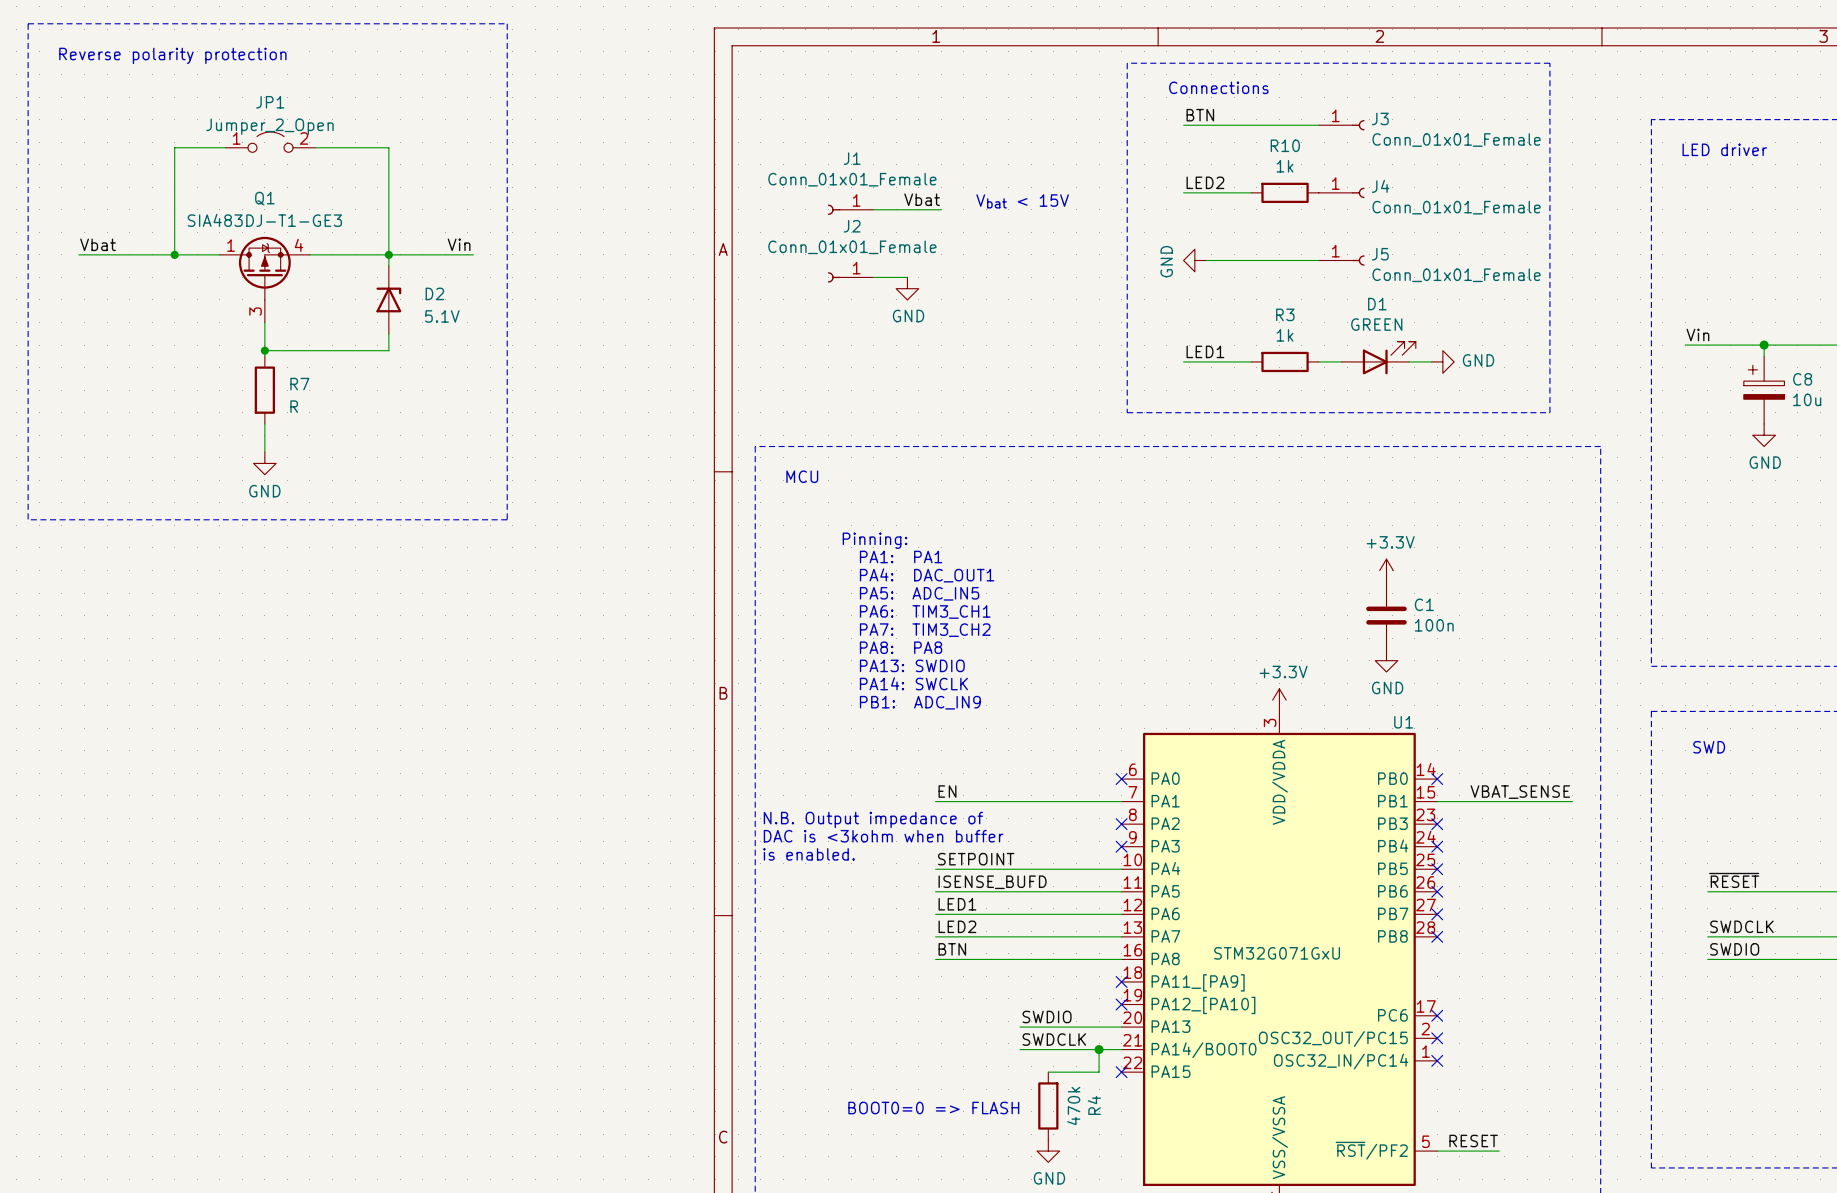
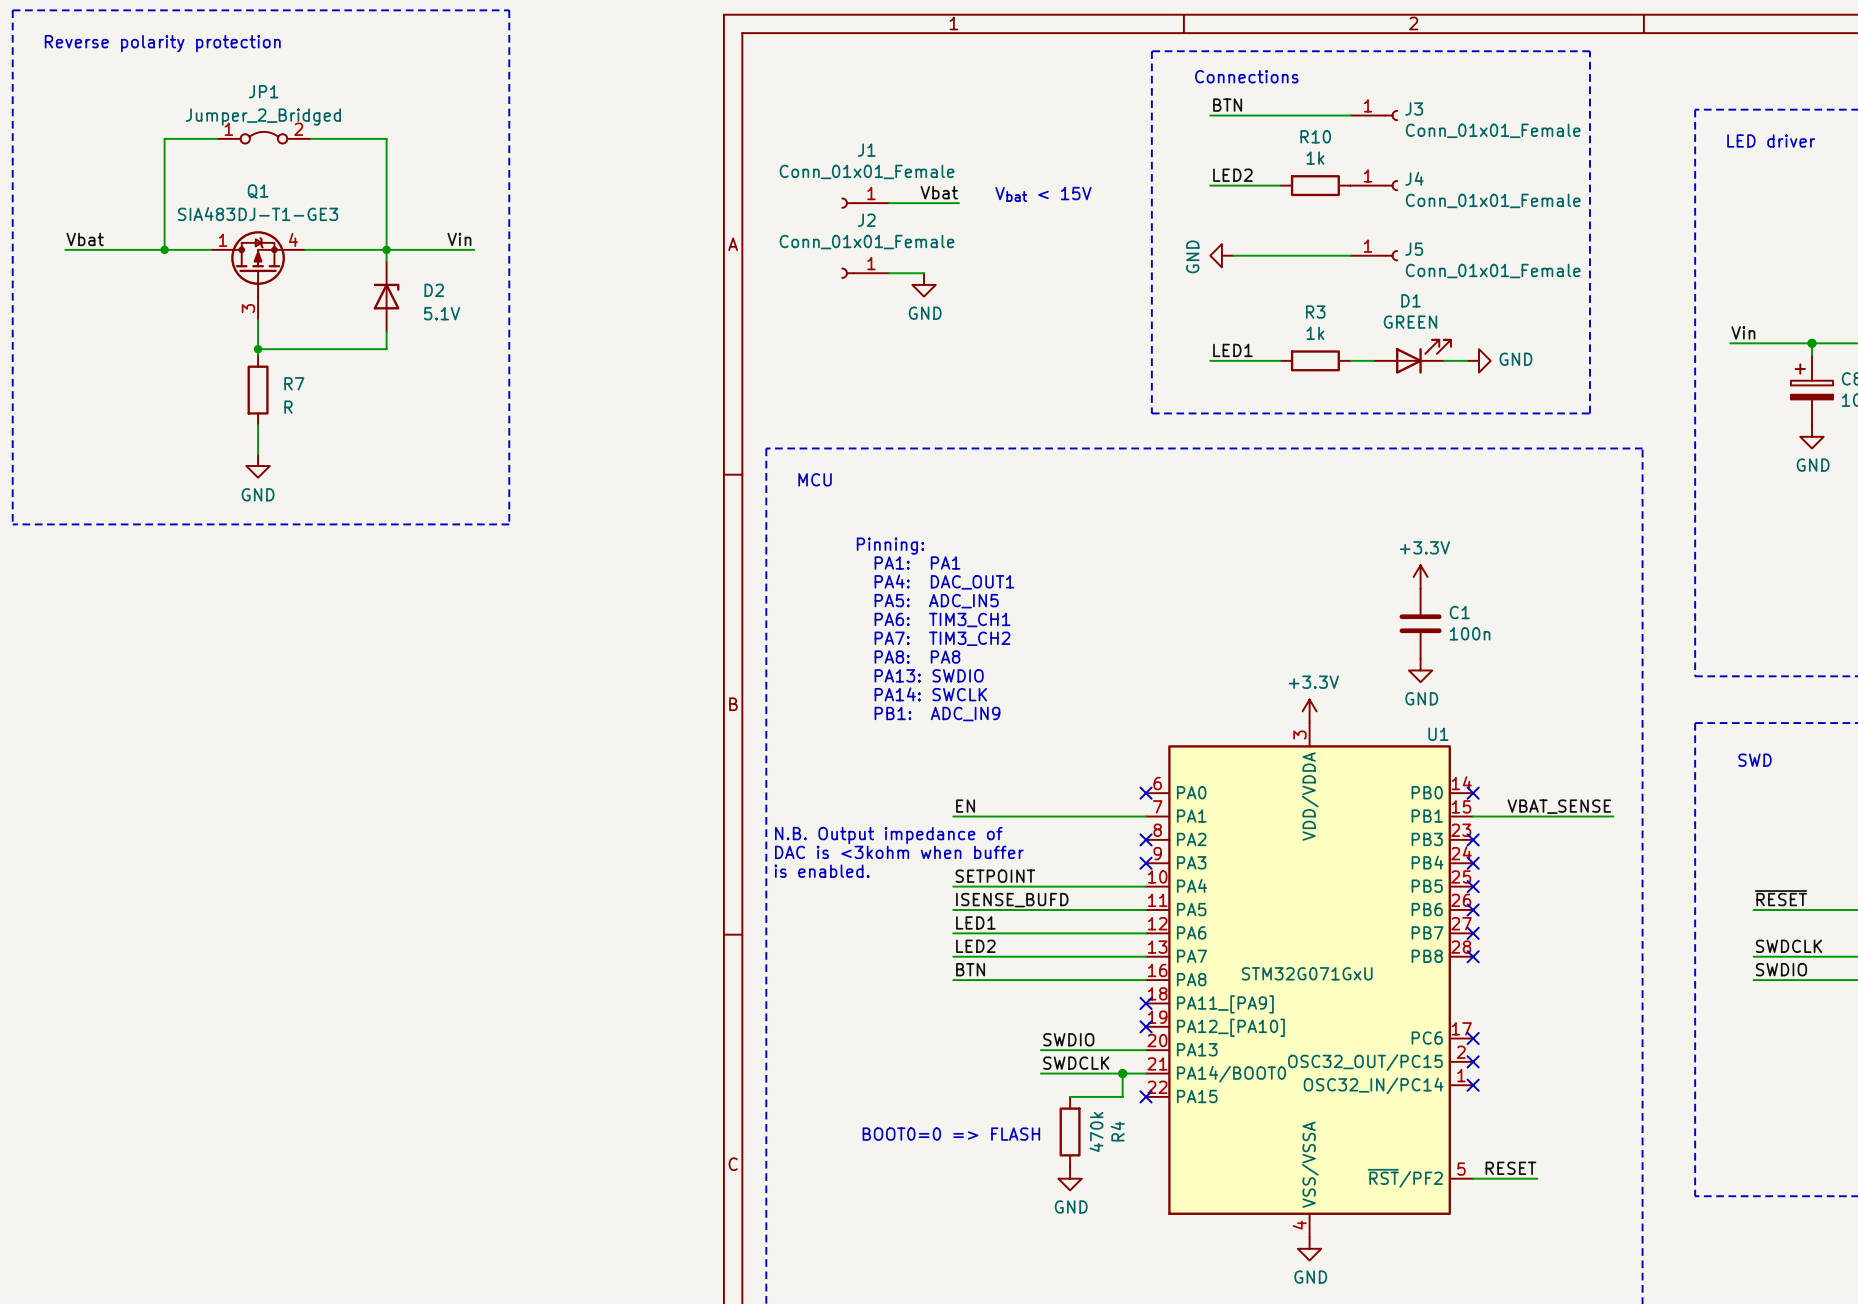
JP1 value: Jumper_2_Open (269, 126) -> Jumper_2_Bridged (263, 117)
JP1 symbol: [225, 132, 316, 153] -> [217, 131, 311, 144]

